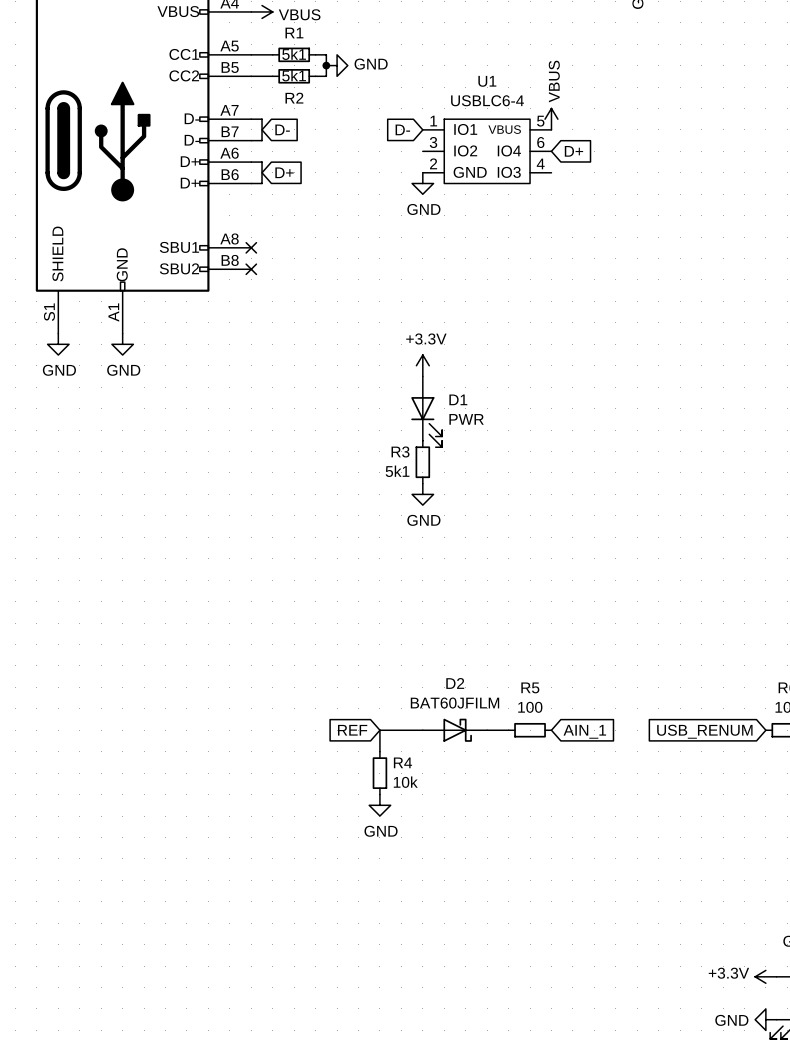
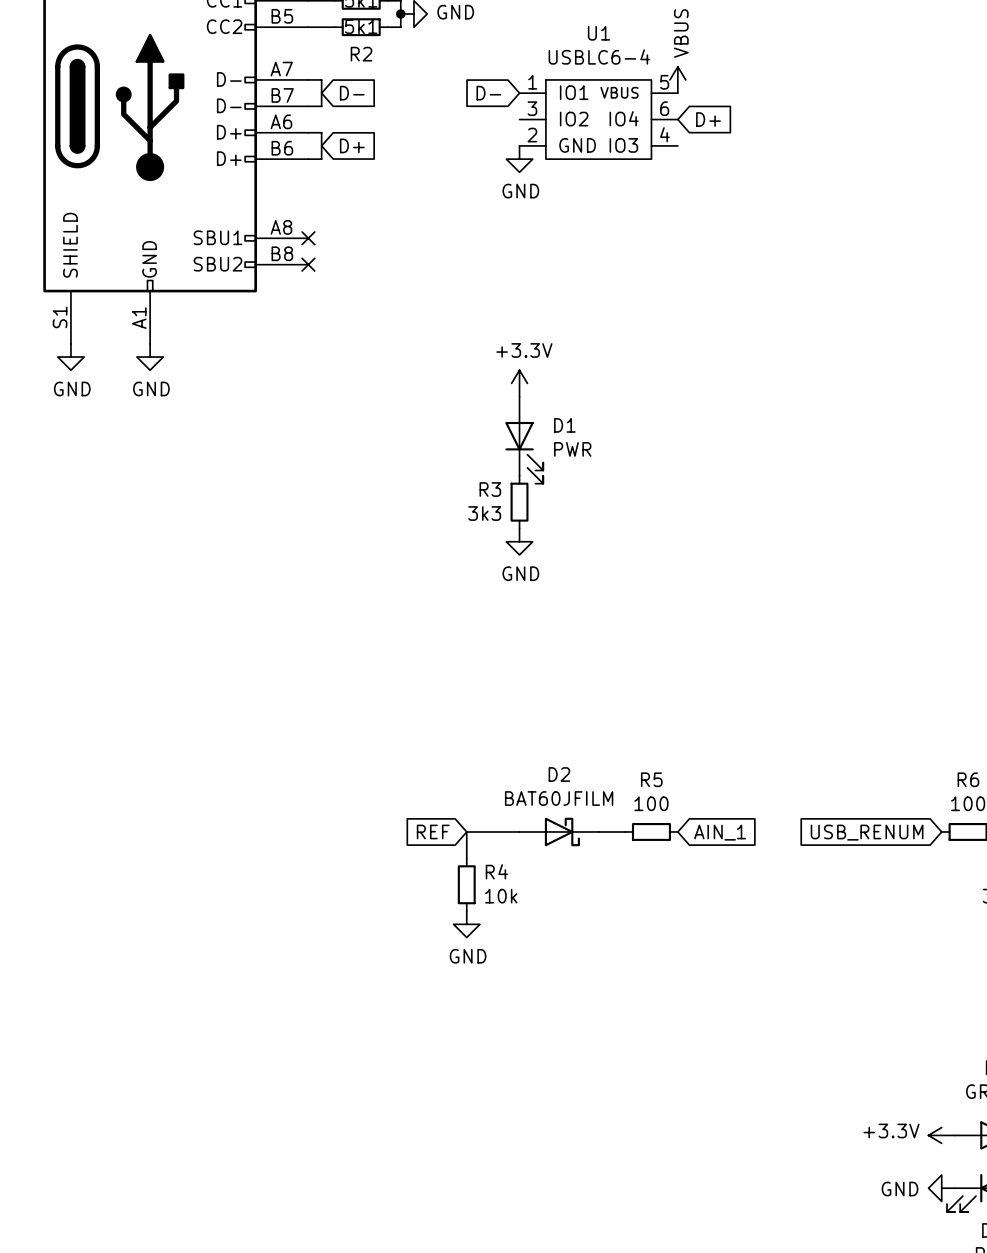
R3 value: 5k1 (397, 471) -> 3k3 (484, 513)

